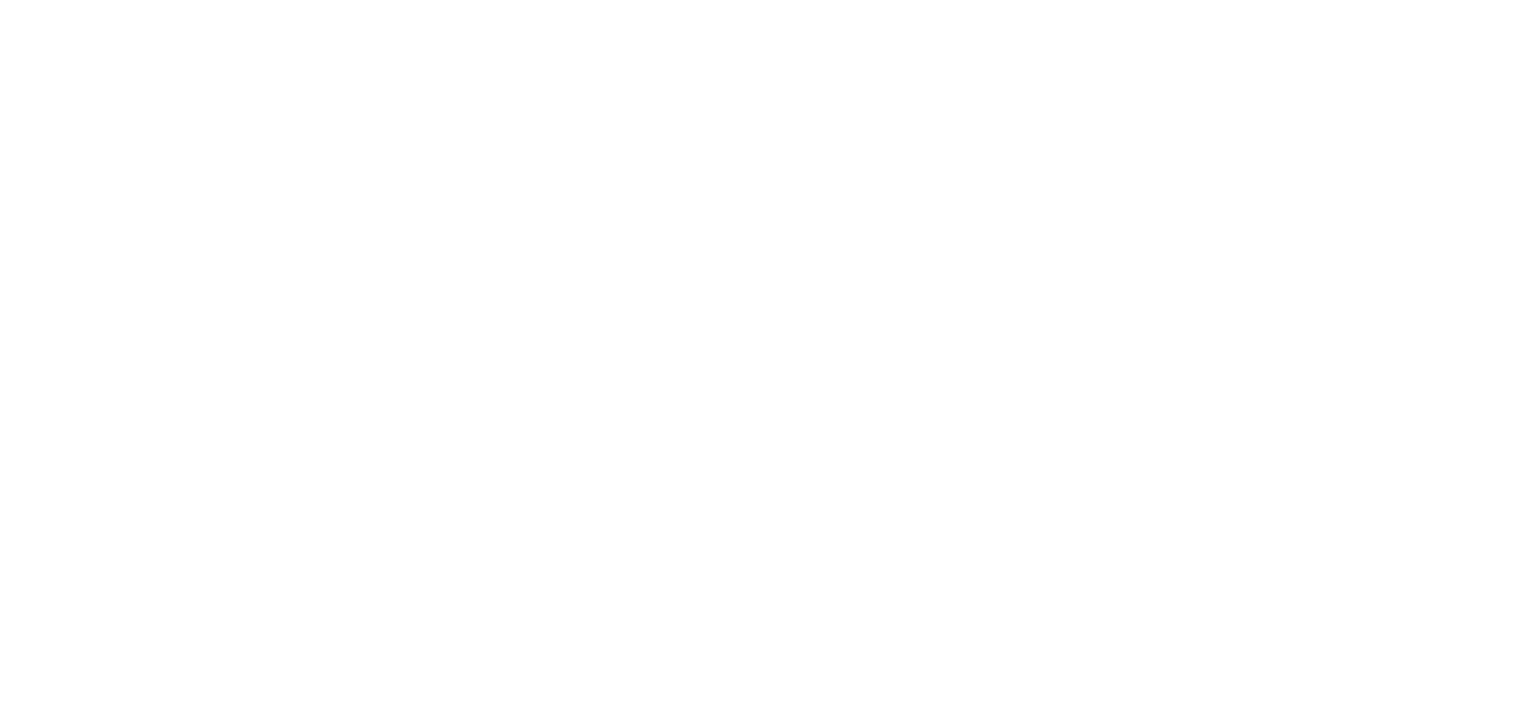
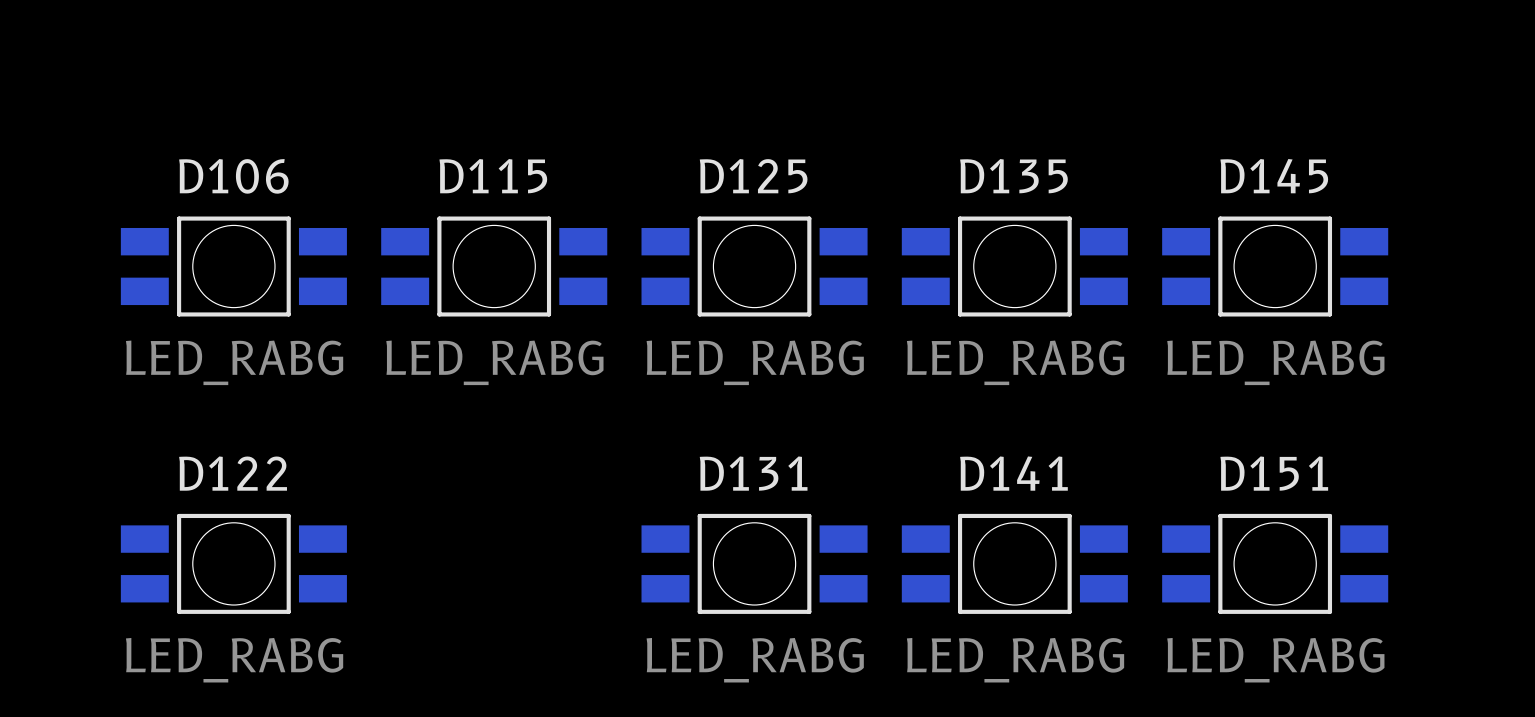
D106: none -> LED_RABG (233, 266)
D115: none -> LED_RABG (494, 266)
D125: none -> LED_RABG (754, 266)
D135: none -> LED_RABG (1014, 266)
D145: none -> LED_RABG (1275, 266)
D122: none -> LED_RABG (233, 563)
D131: none -> LED_RABG (754, 563)
D141: none -> LED_RABG (1014, 563)
D151: none -> LED_RABG (1275, 563)

